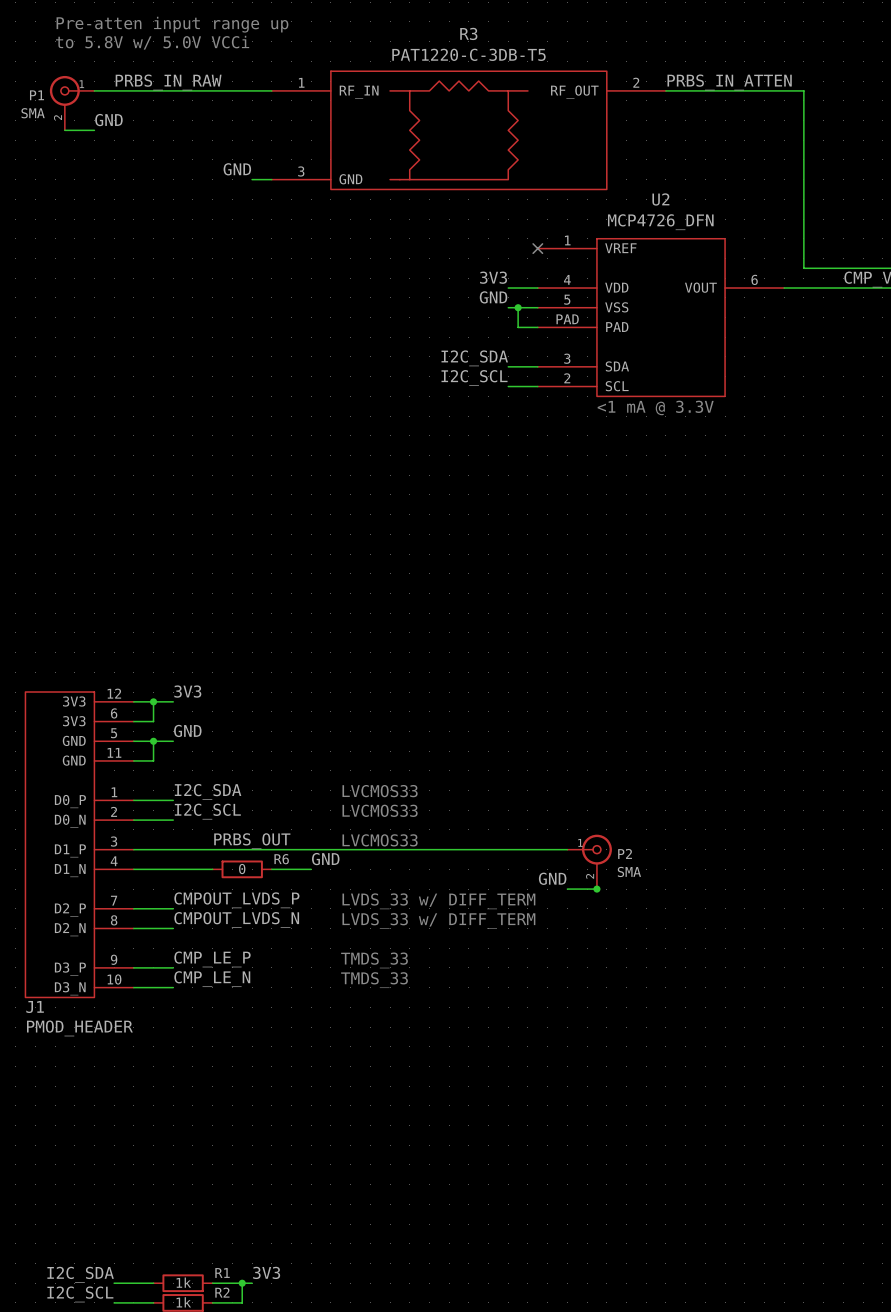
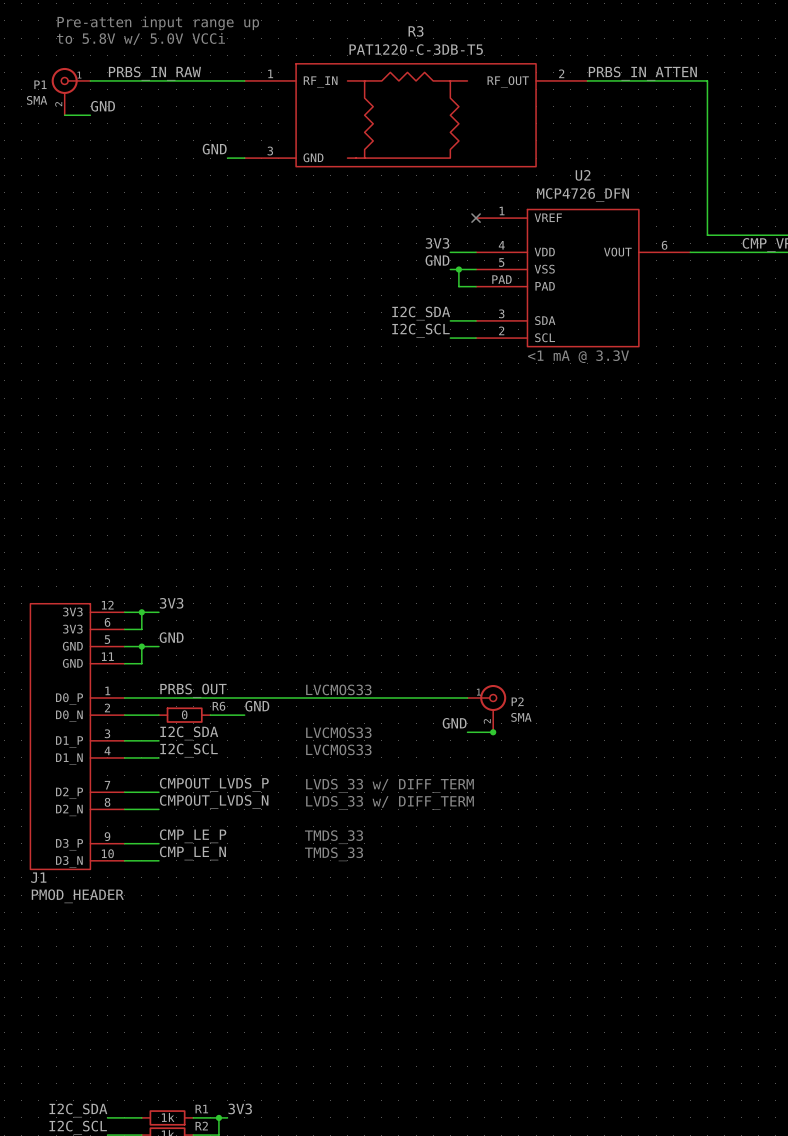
label: I2C_SDA (208, 791) -> PRBS_OUT (193, 690)
wire: none -> (158, 698) (467, 698)
text position: LVCMOS33 (380, 810) -> LVCMOS33 (338, 749)
label position: I2C_SCL (207, 811) -> I2C_SCL (189, 750)
junction: none -> (493, 732)
label: none -> I2C_SDA (189, 733)
label: PRBS_OUT (252, 841) -> none
wire: (173, 849) (567, 849) -> none
label position: GND (325, 859) -> GND (257, 706)
P2 position: (589, 861) -> (486, 708)
wire: (173, 869) (212, 869) -> none
R6 position: (242, 869) -> (184, 715)
wire: (271, 869) (311, 869) -> (210, 715) (244, 715)
label position: GND (552, 878) -> GND (454, 723)
wire: (567, 889) (596, 889) -> (467, 732) (493, 732)
junction: (596, 889) -> none

